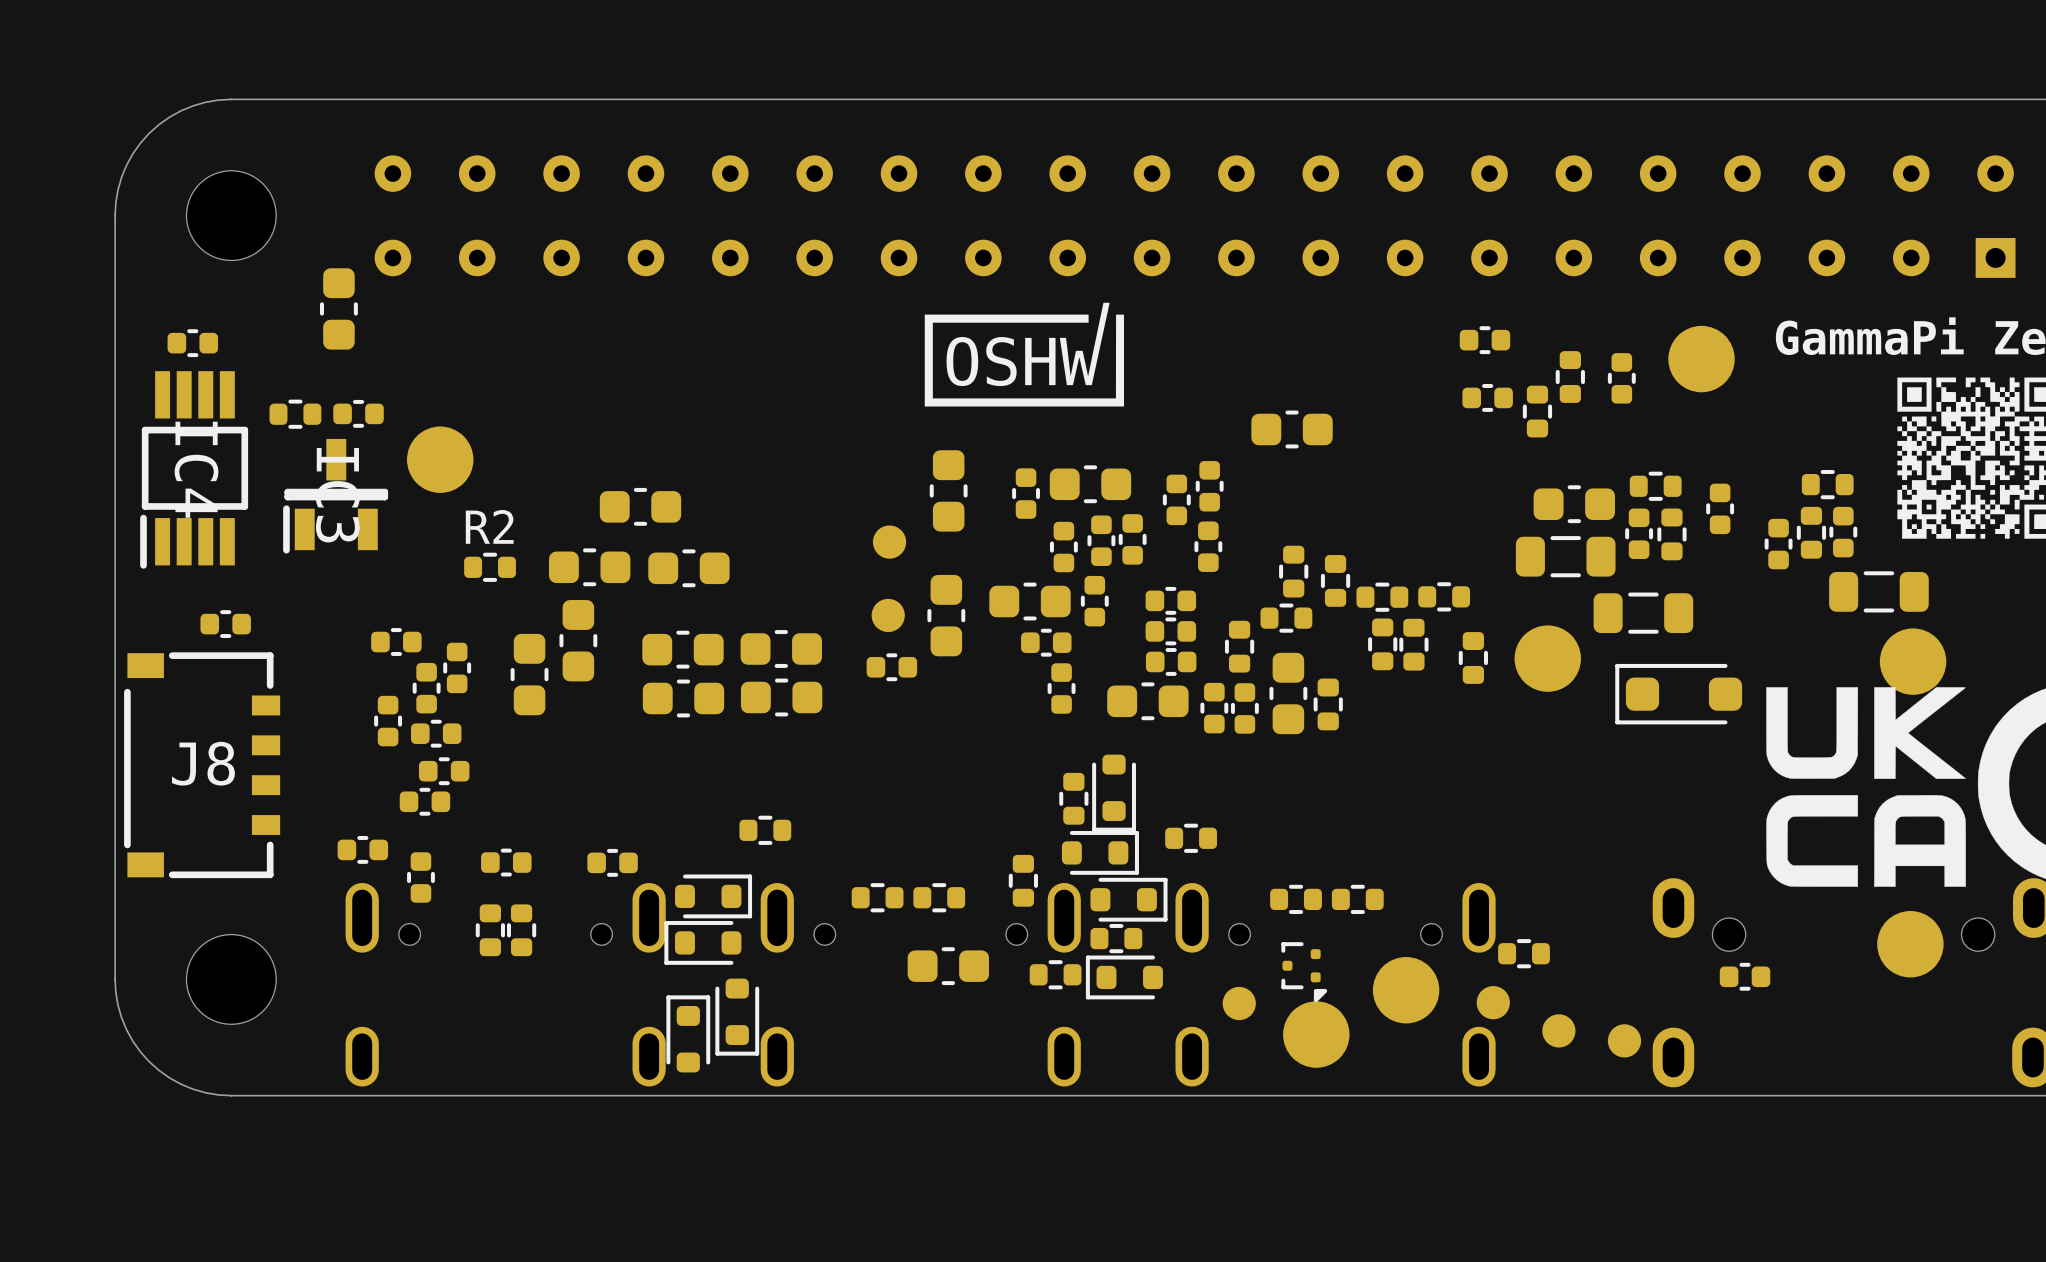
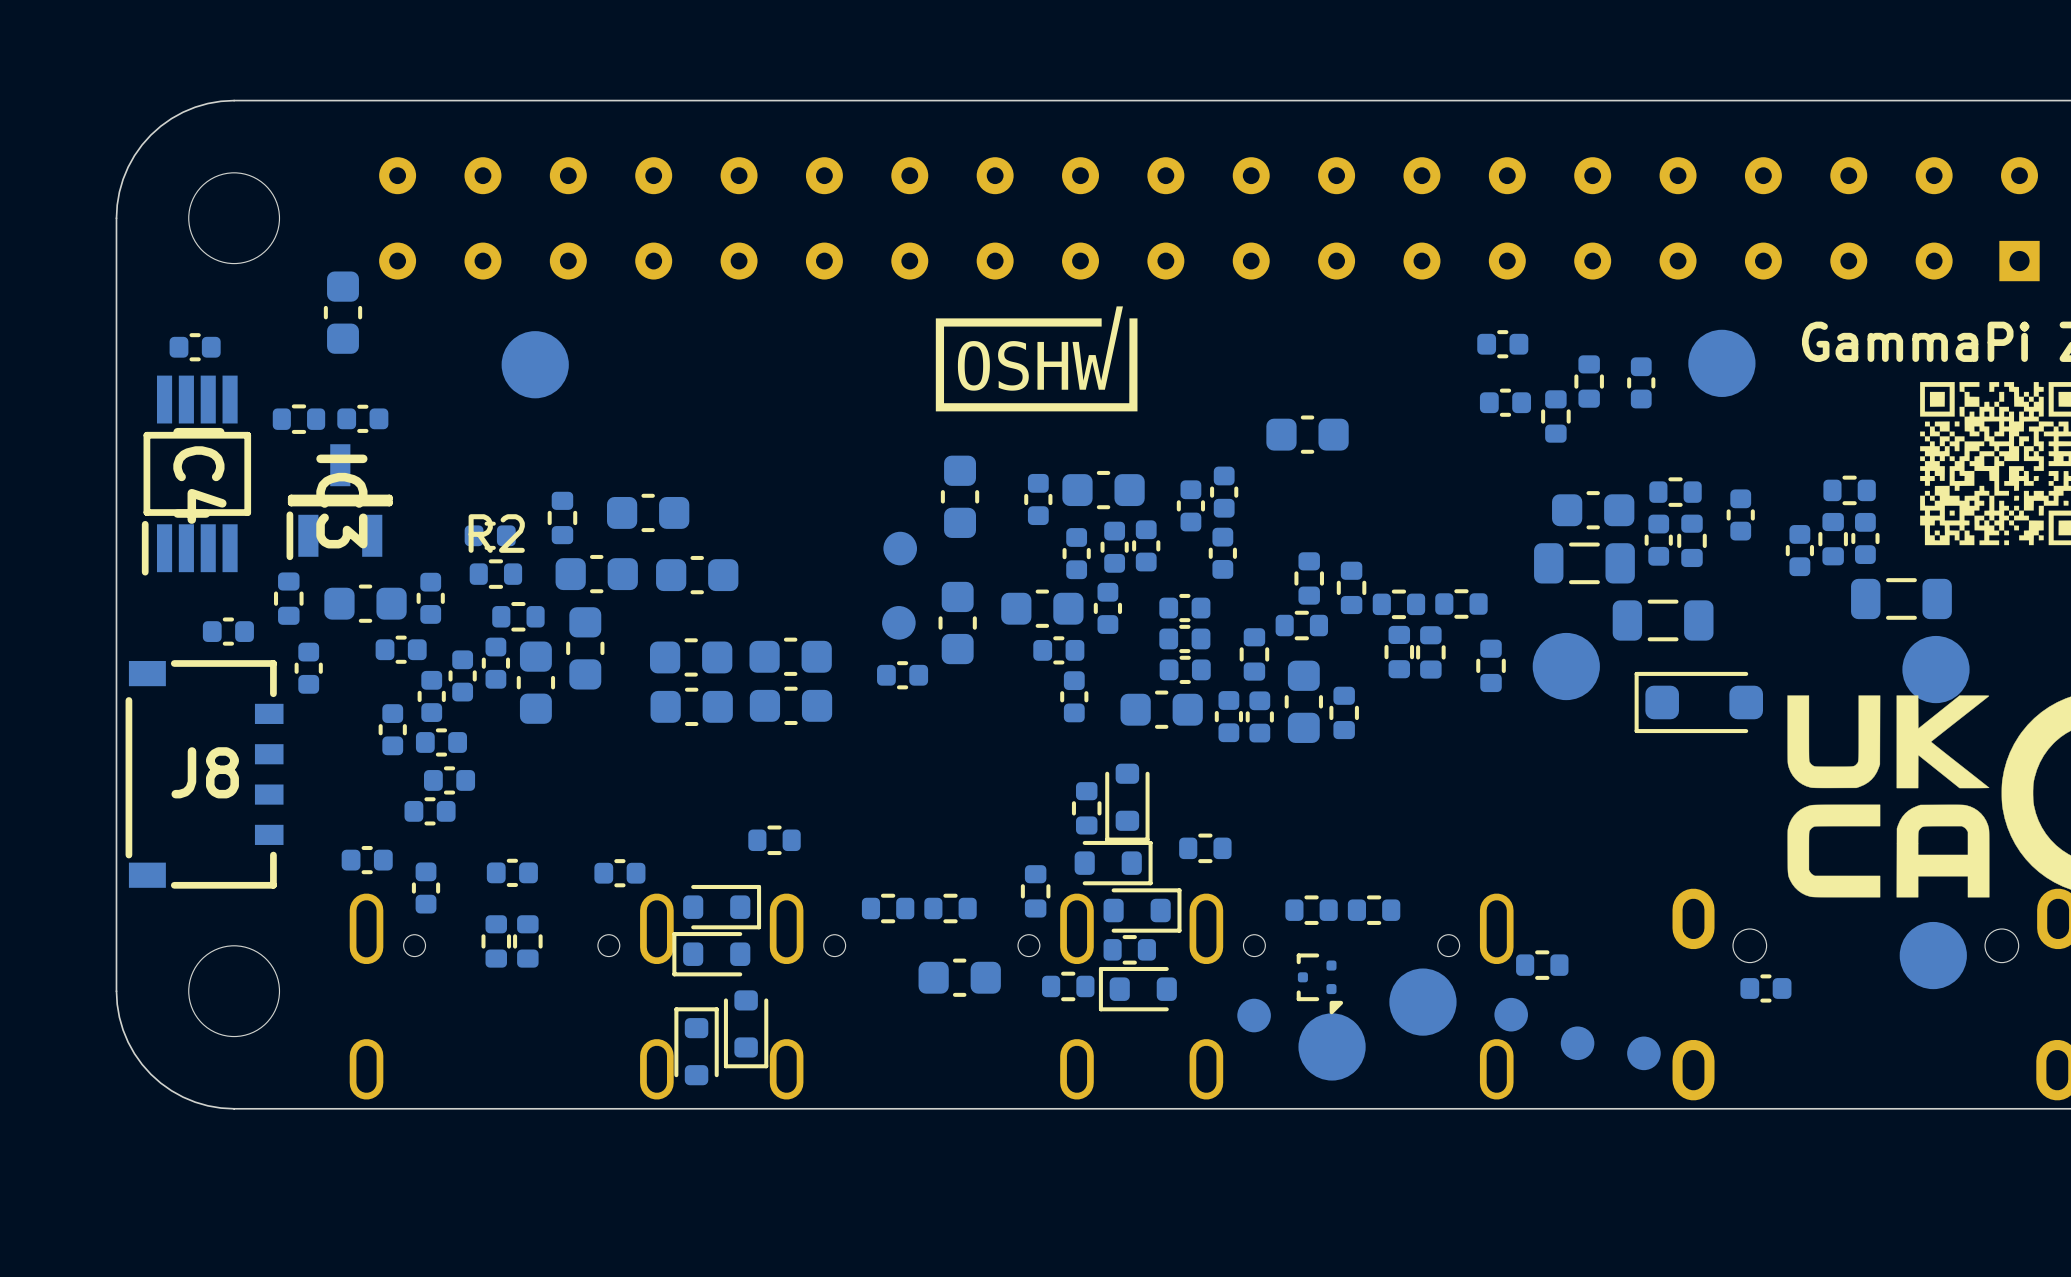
part position: (440, 459) -> (535, 364)
part: none -> (562, 517)
part: none -> (490, 535)
part: none -> (288, 598)
part: none -> (430, 598)
part: none -> (365, 603)
part: none -> (518, 616)
part: none -> (495, 663)
part: none -> (308, 668)

